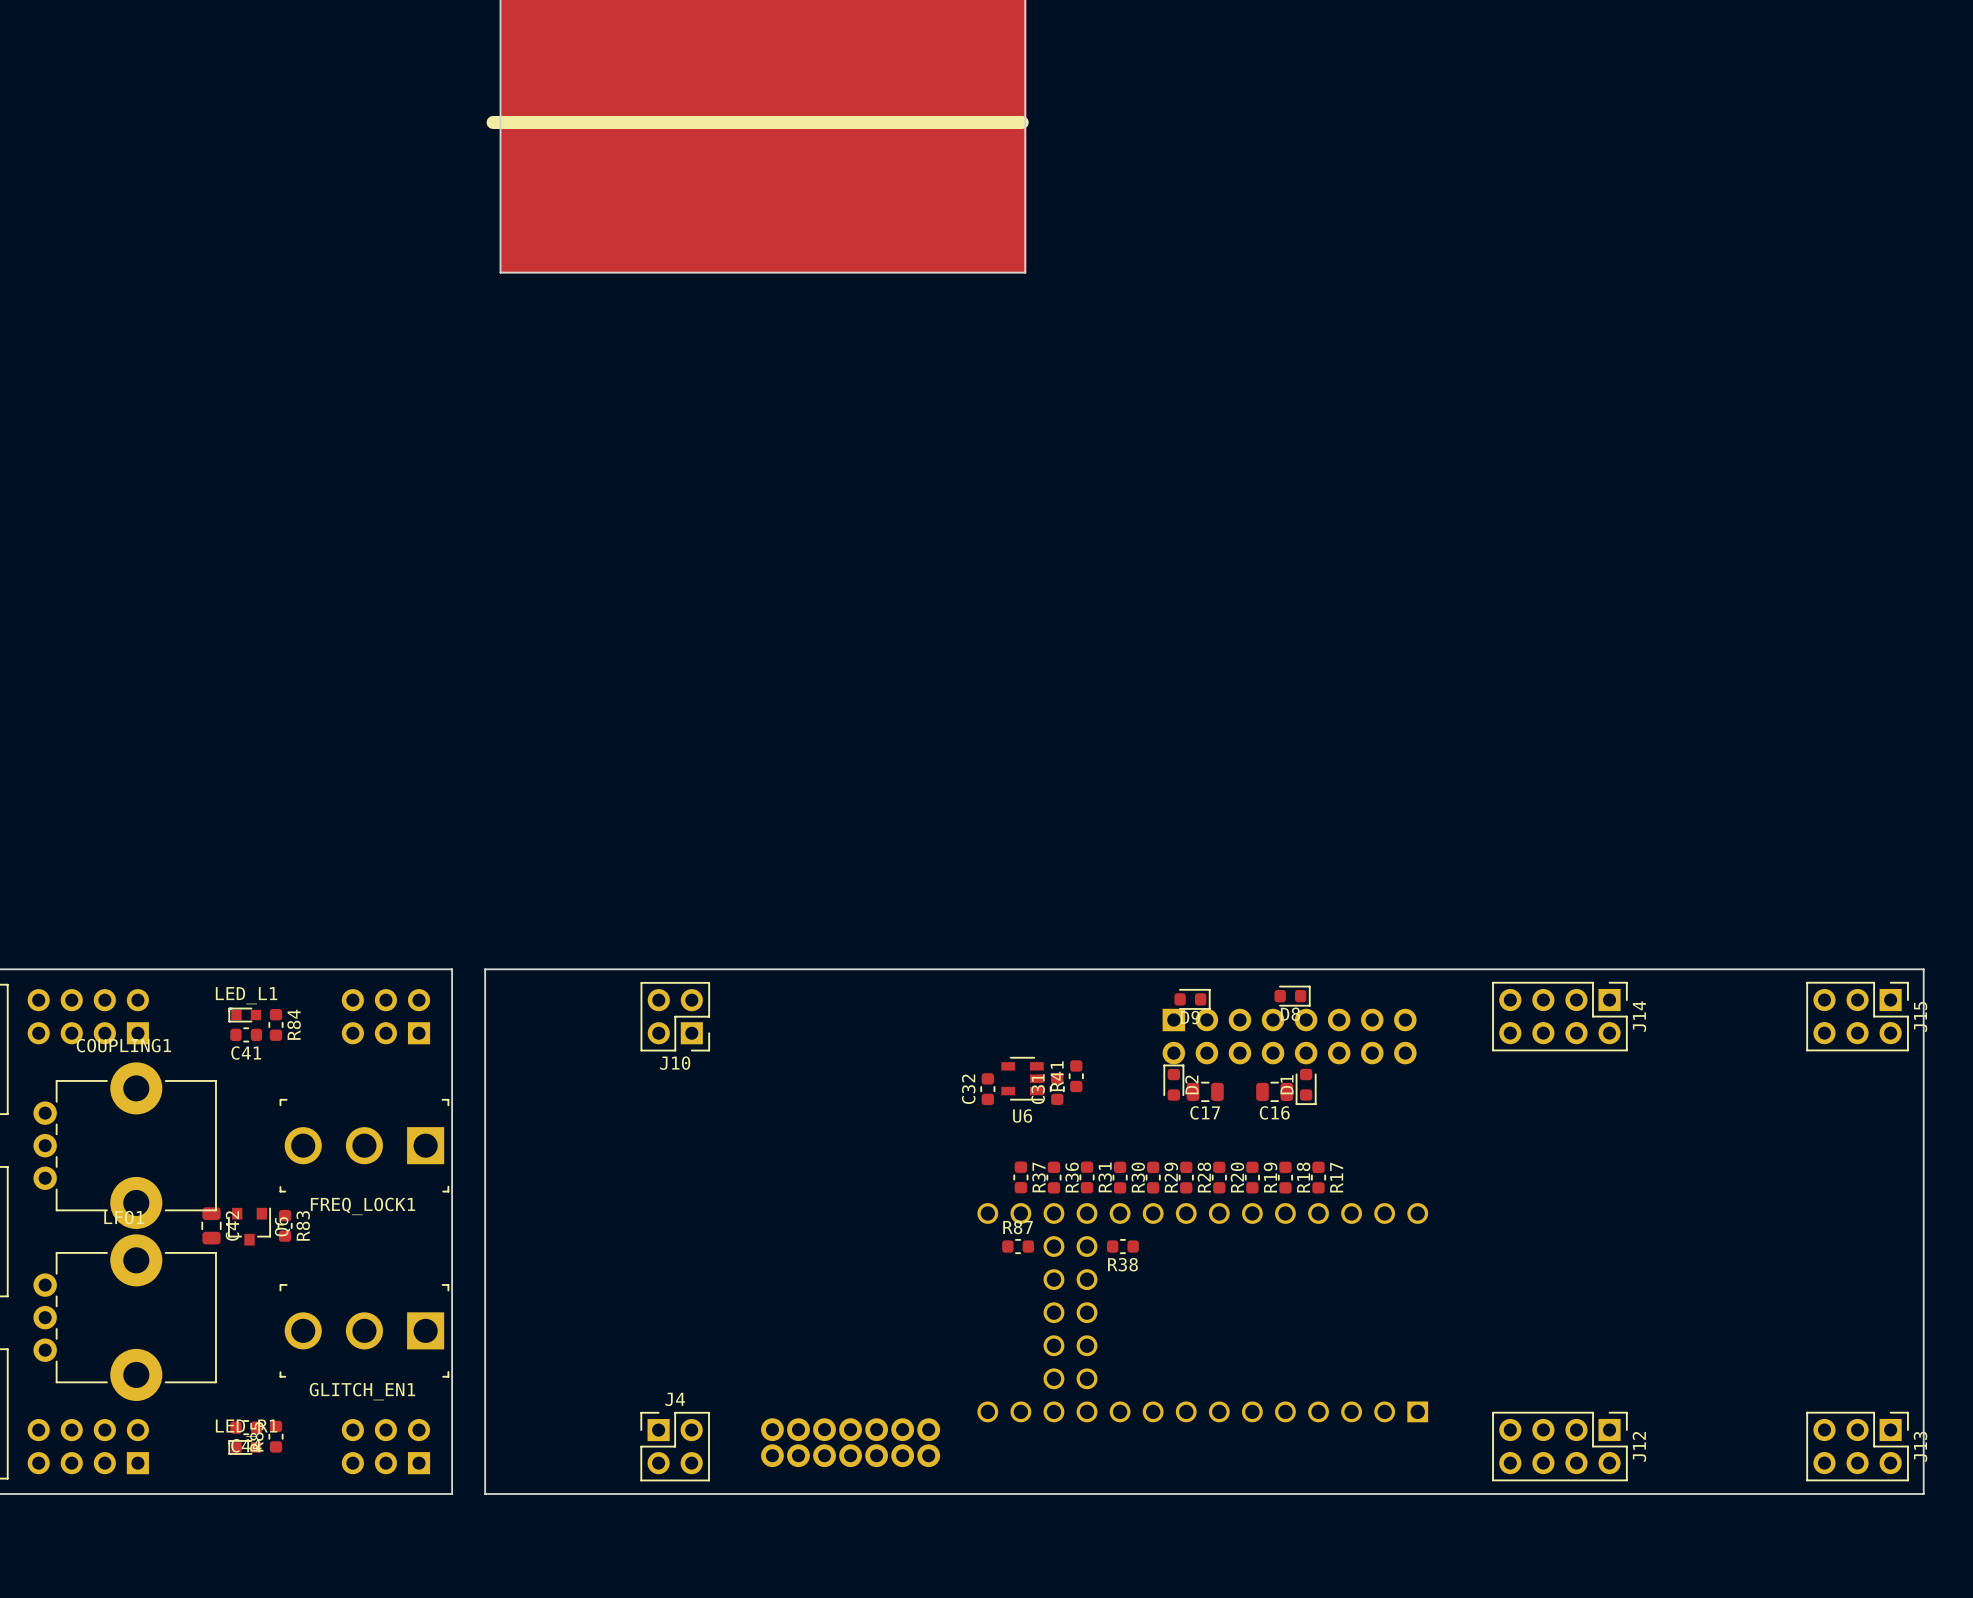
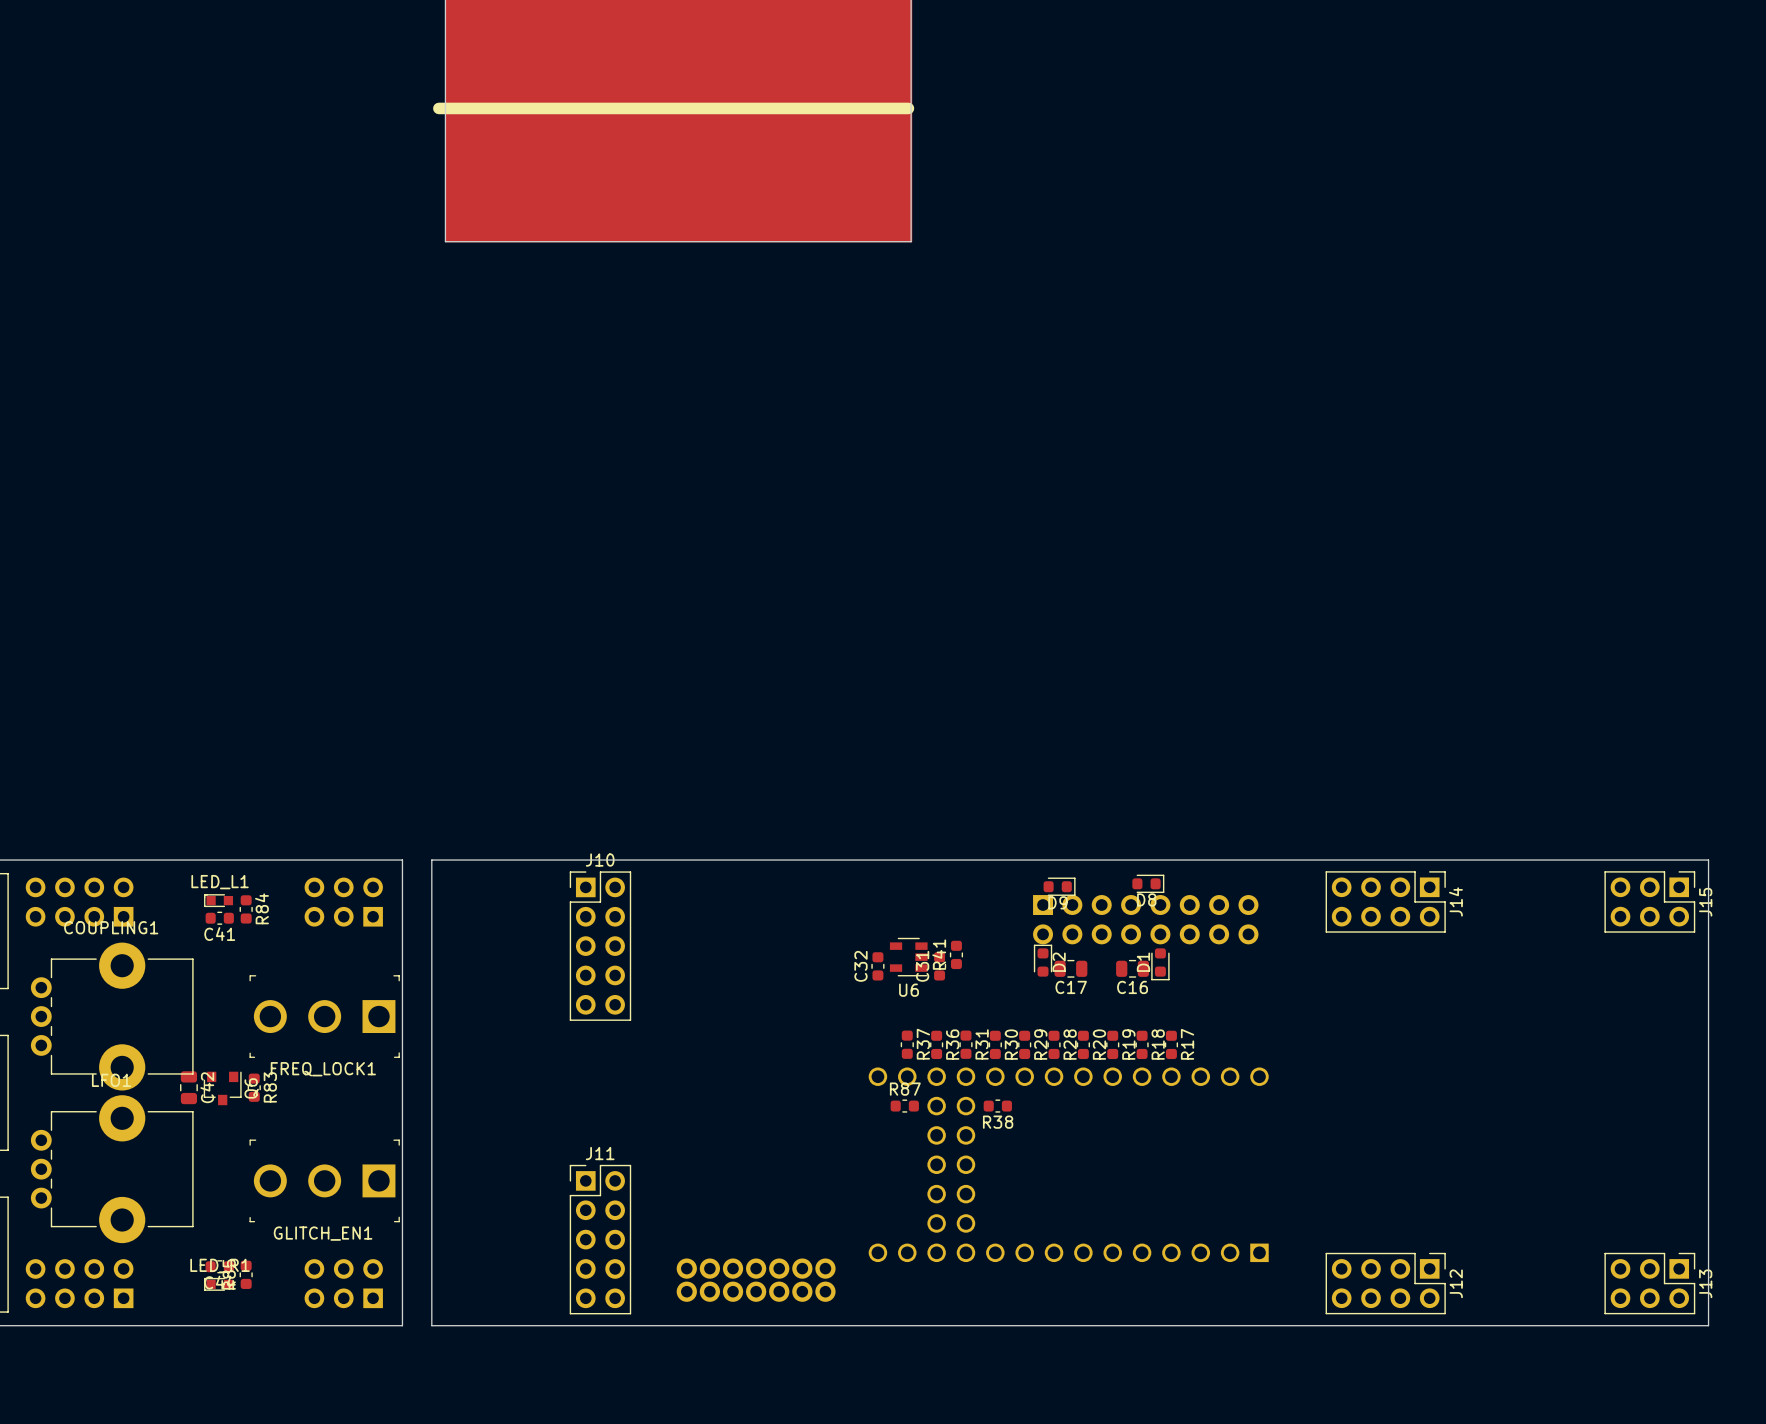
J10 footprint: [640, 982, 710, 1052] -> [569, 871, 632, 1021]
J10 name position: J10 (675, 1063) -> J10 (600, 860)
J11: none -> (600, 1239)
J4: (675, 1446) -> none

